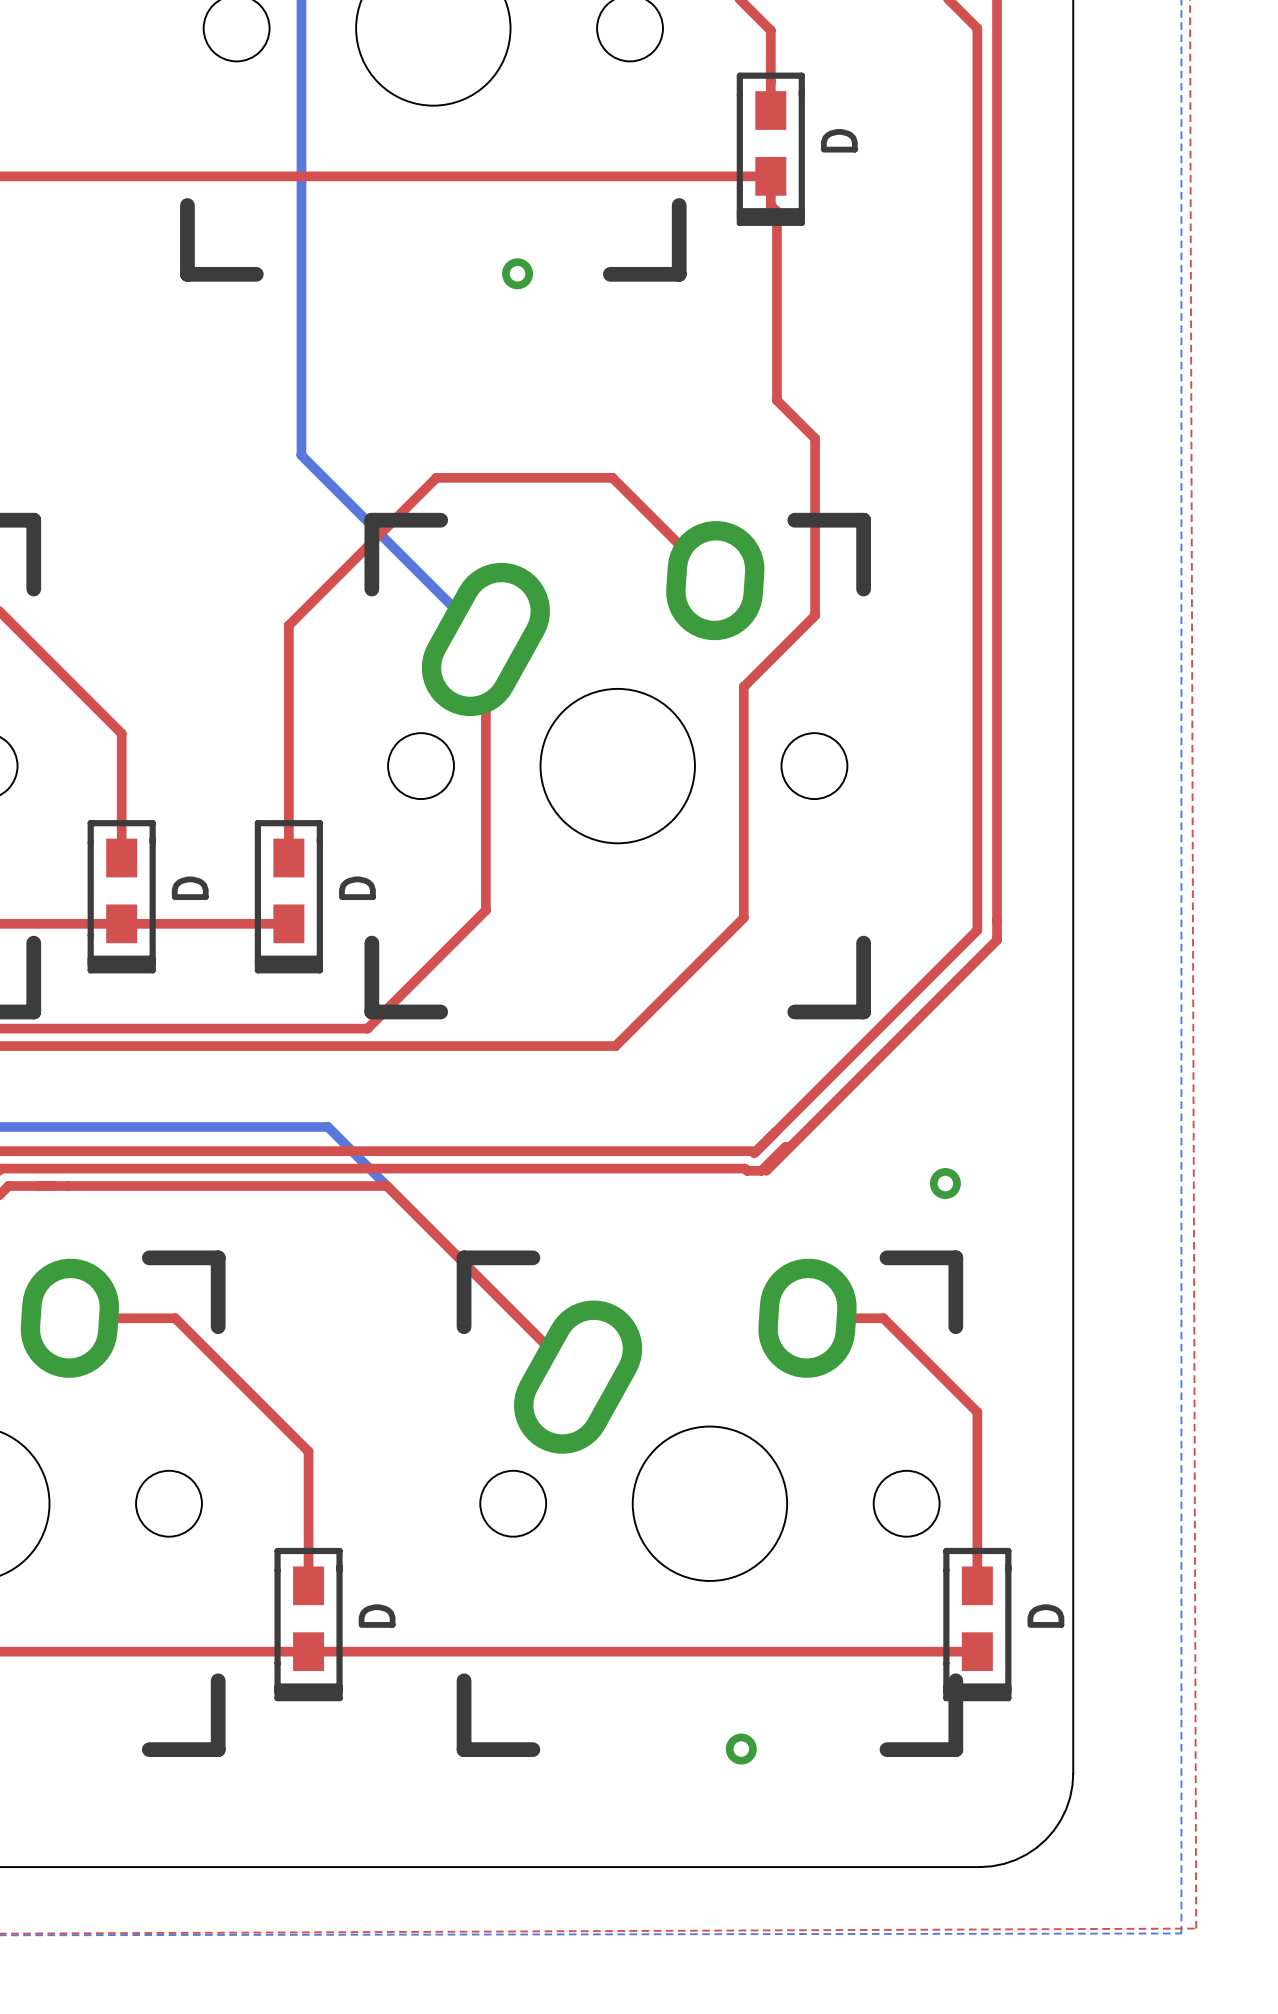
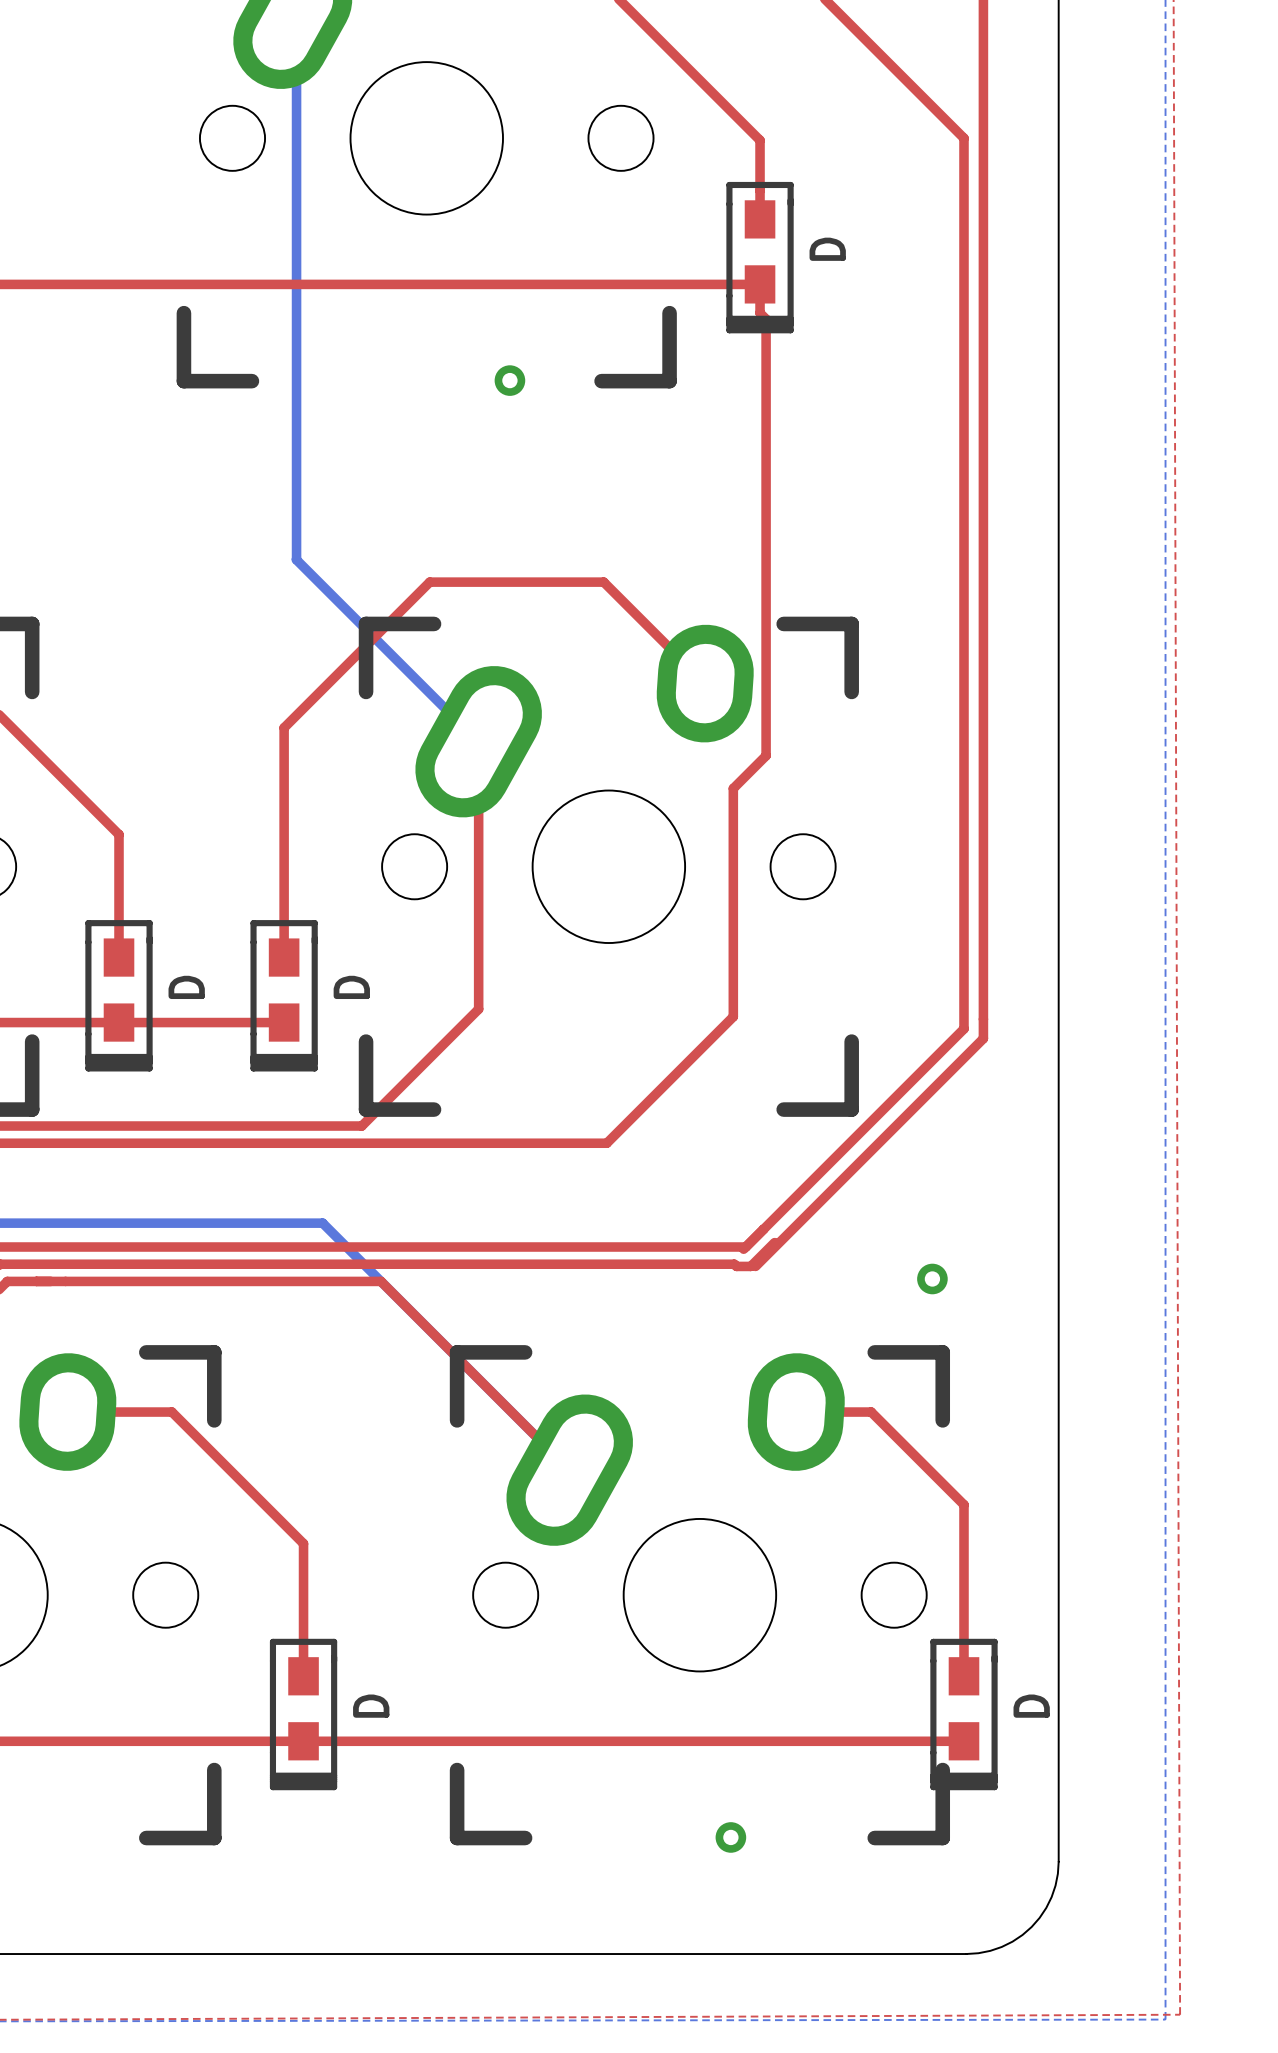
top track: (776, 400) (815, 438) (815, 615) (776, 653) -> (766, 505) (766, 755)

